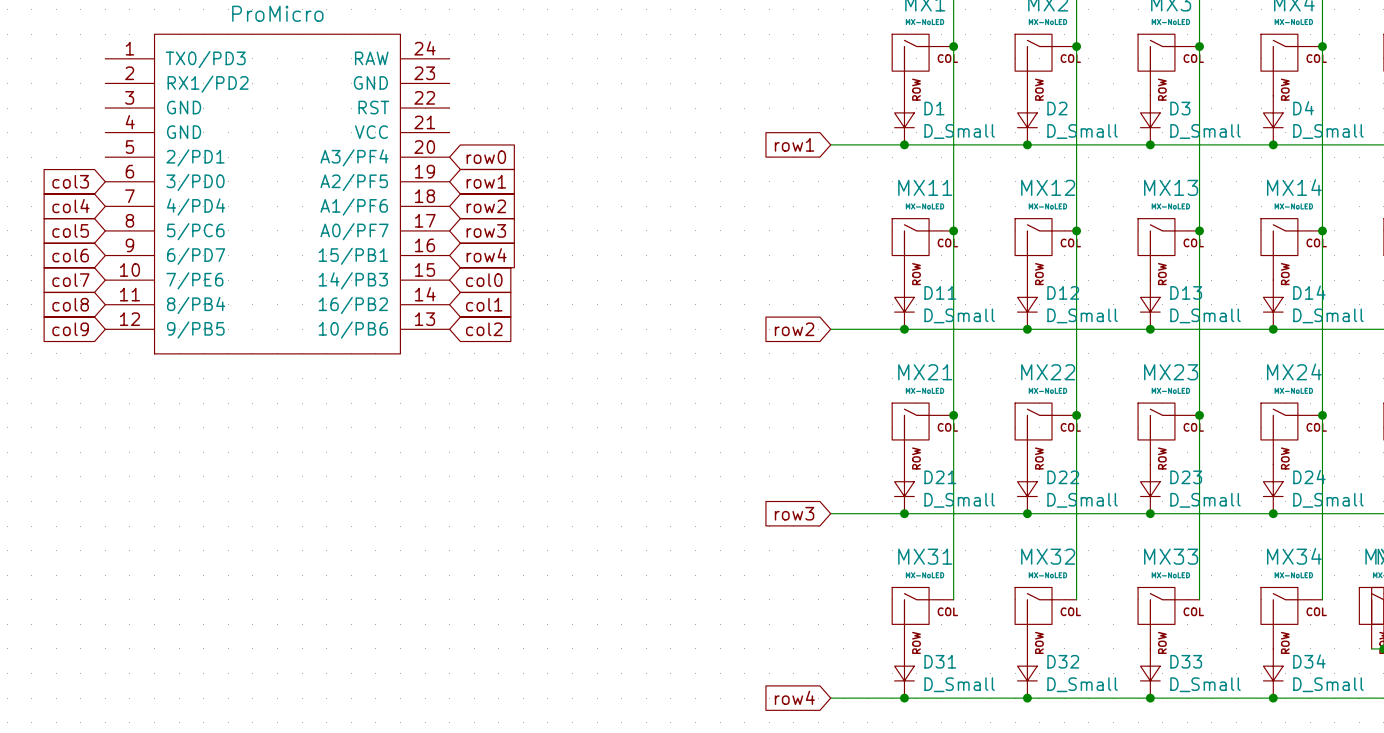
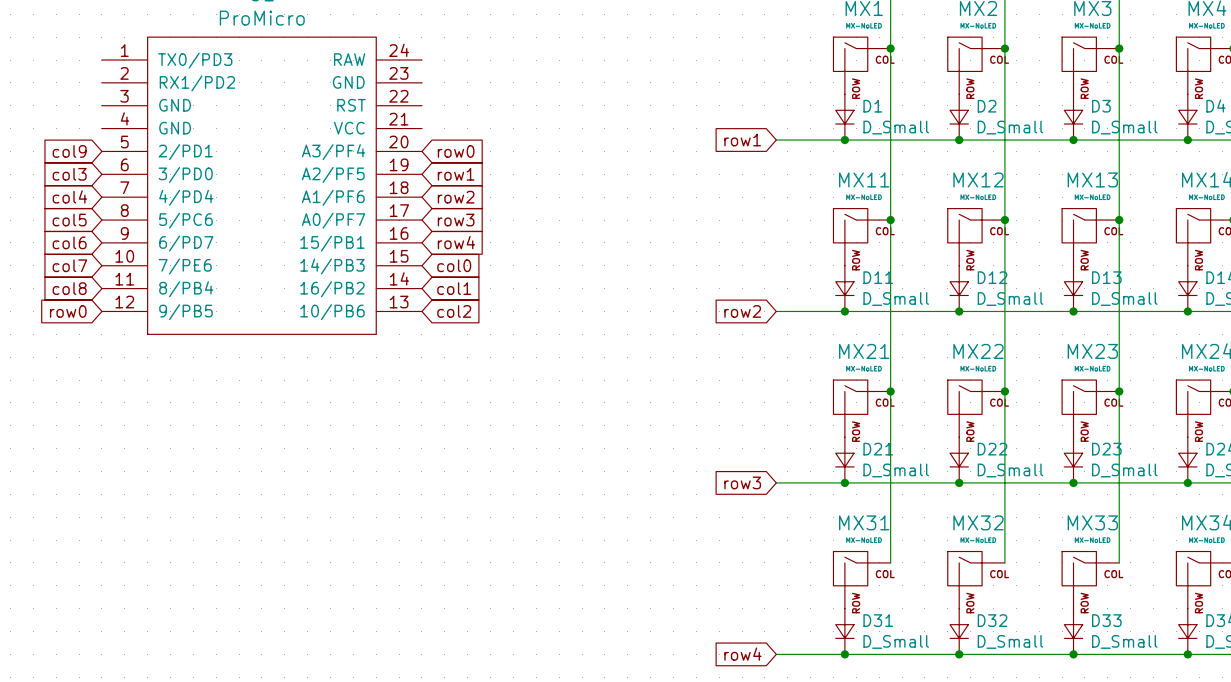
global label: none -> col9 (69, 151)
global label: col9 (70, 329) -> row0 (68, 311)

